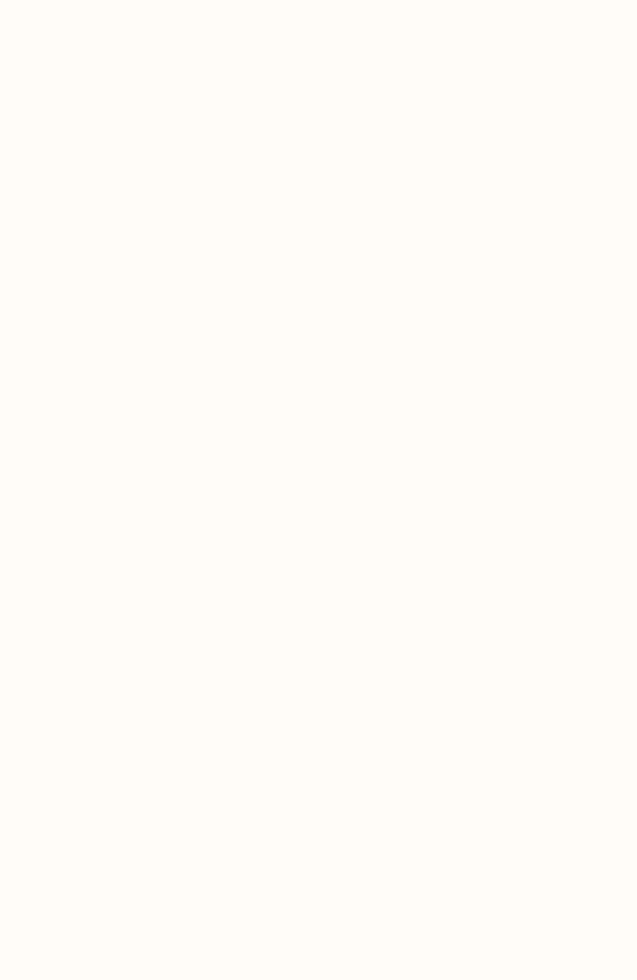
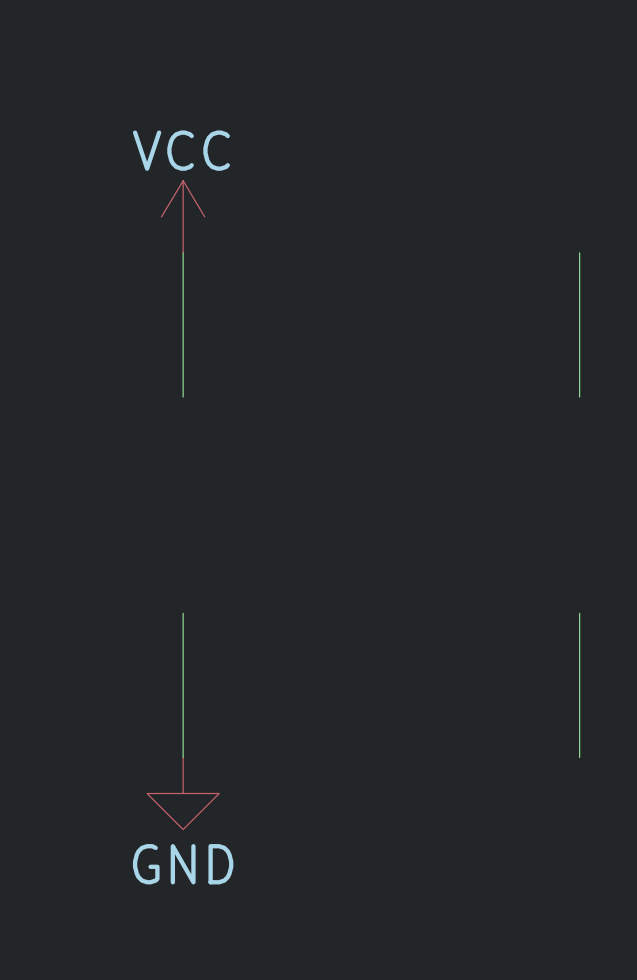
power symbol: none -> VCC (183, 216)
wire: none -> (183, 252) (183, 397)
wire: none -> (579, 252) (579, 397)
wire: none -> (183, 613) (183, 757)
wire: none -> (579, 613) (579, 757)
power symbol: none -> GND (183, 793)

